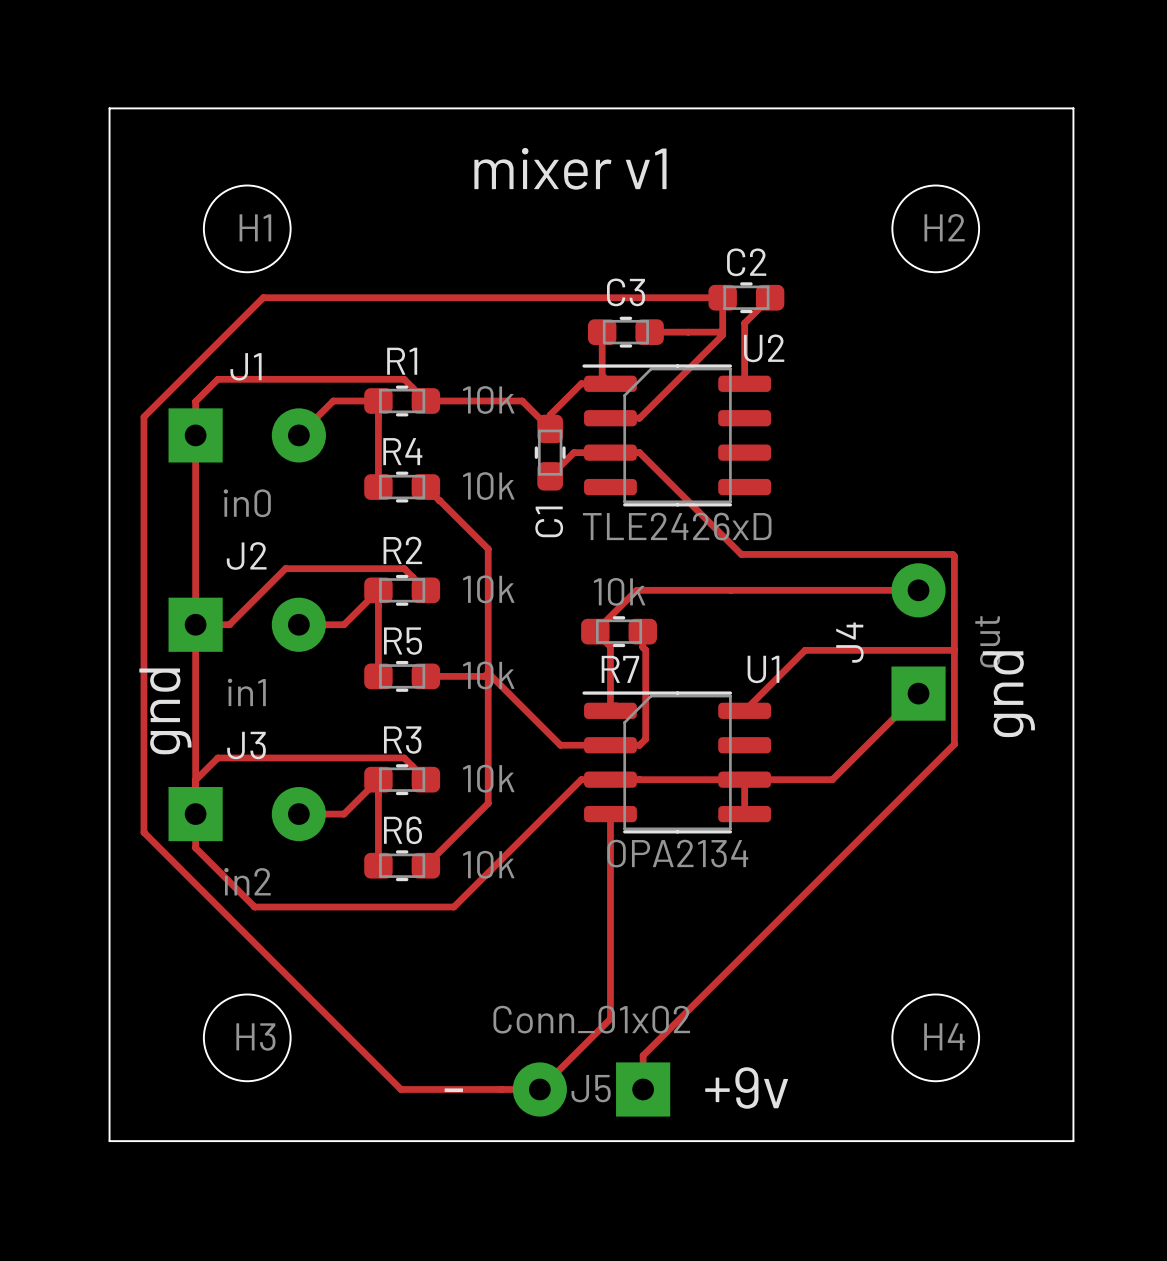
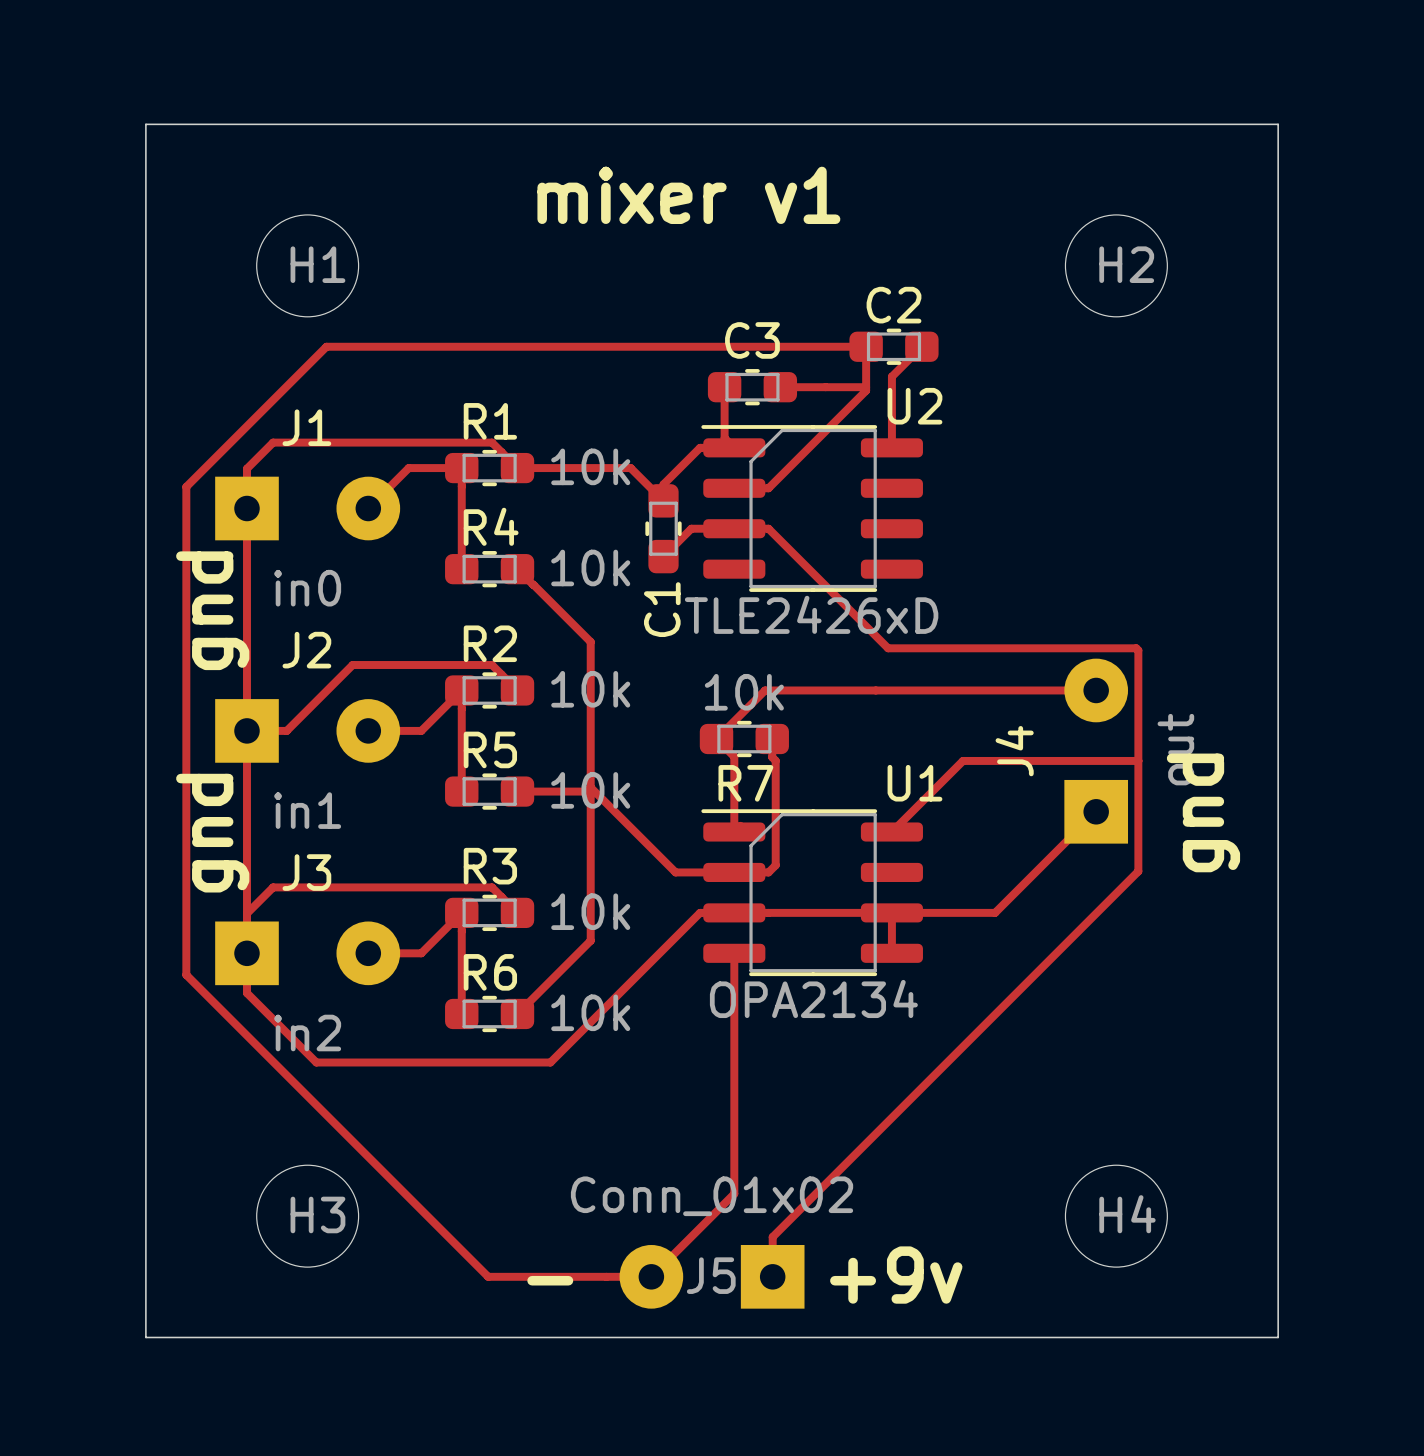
text: none -> gnd (212, 610)

